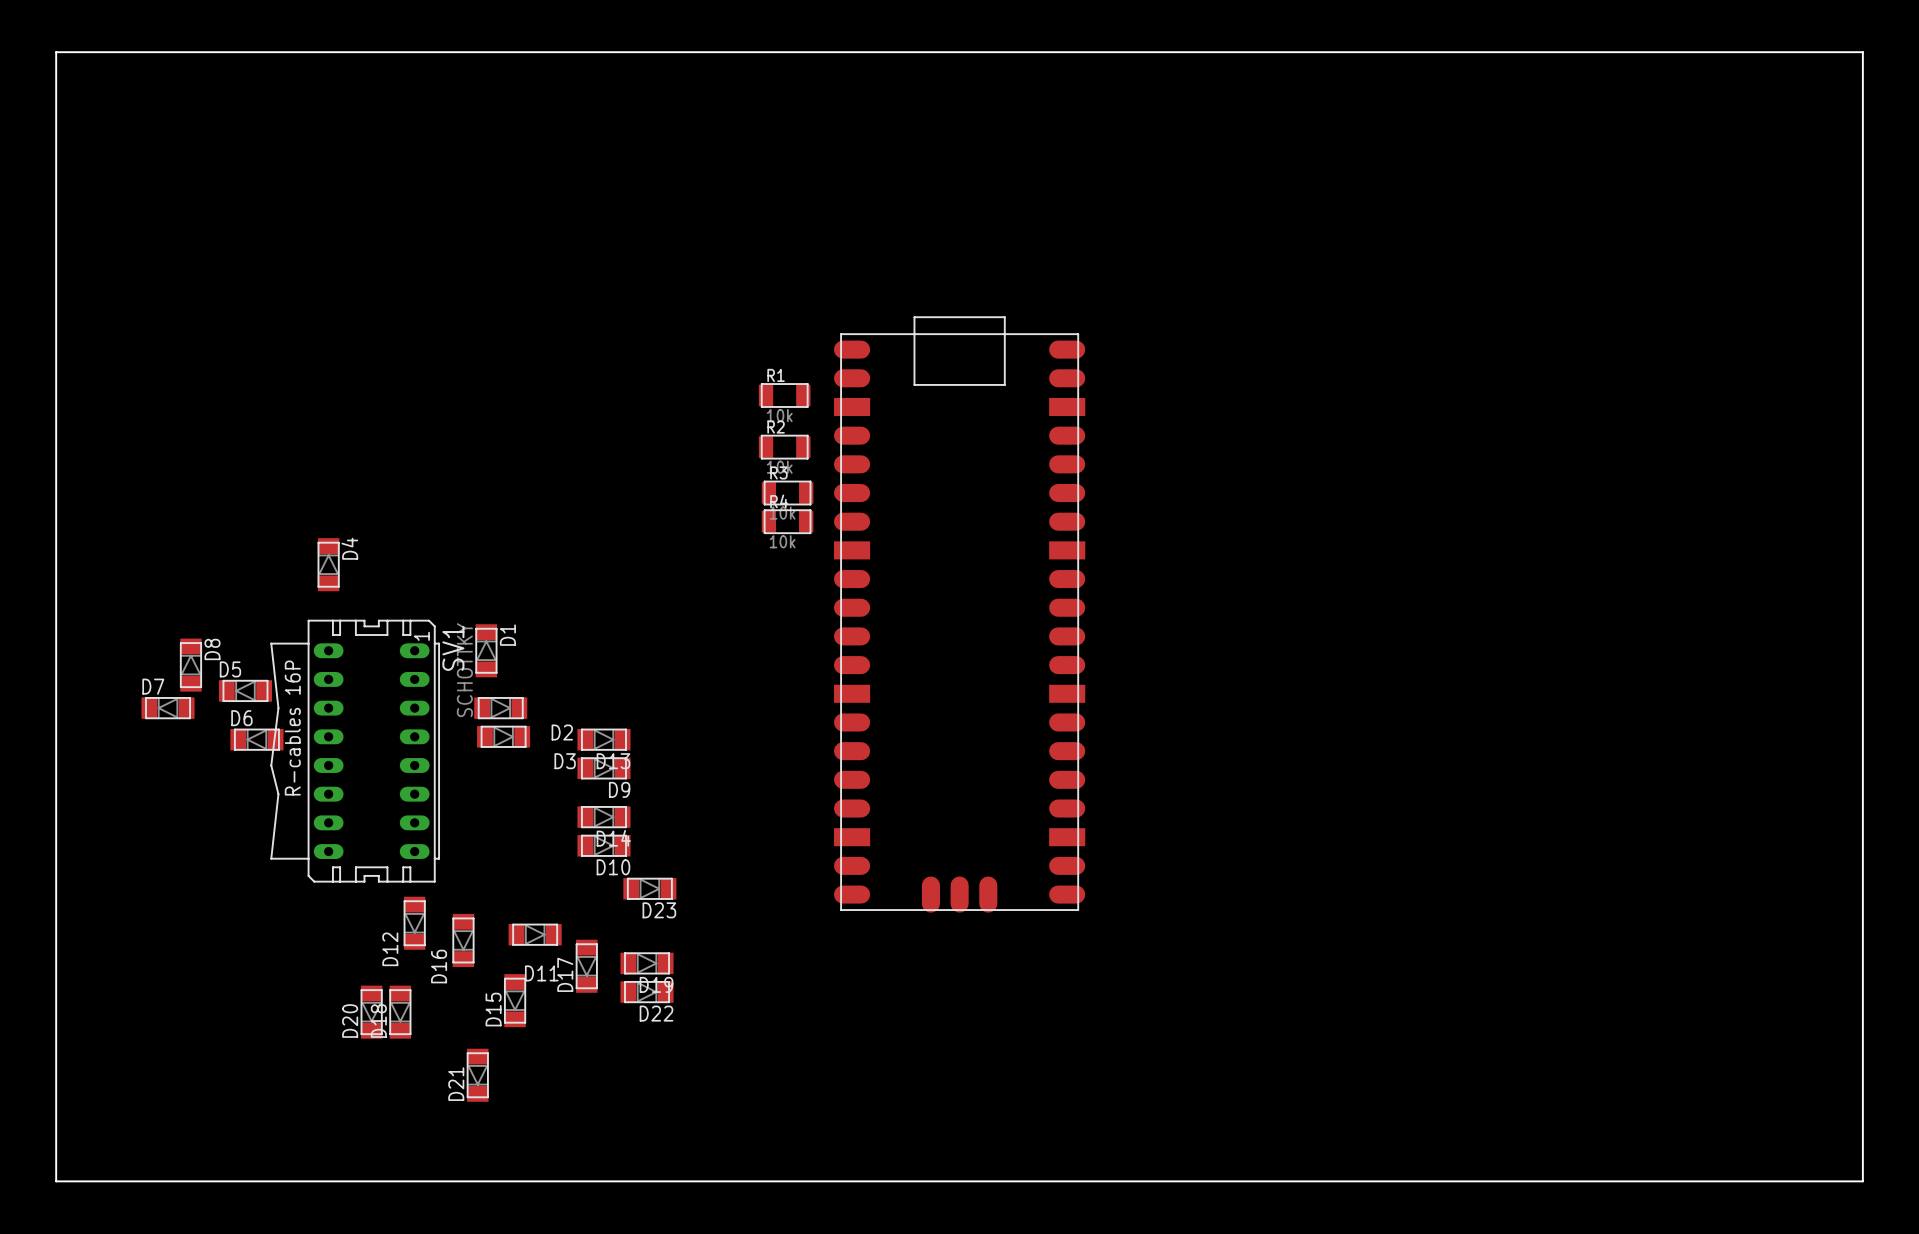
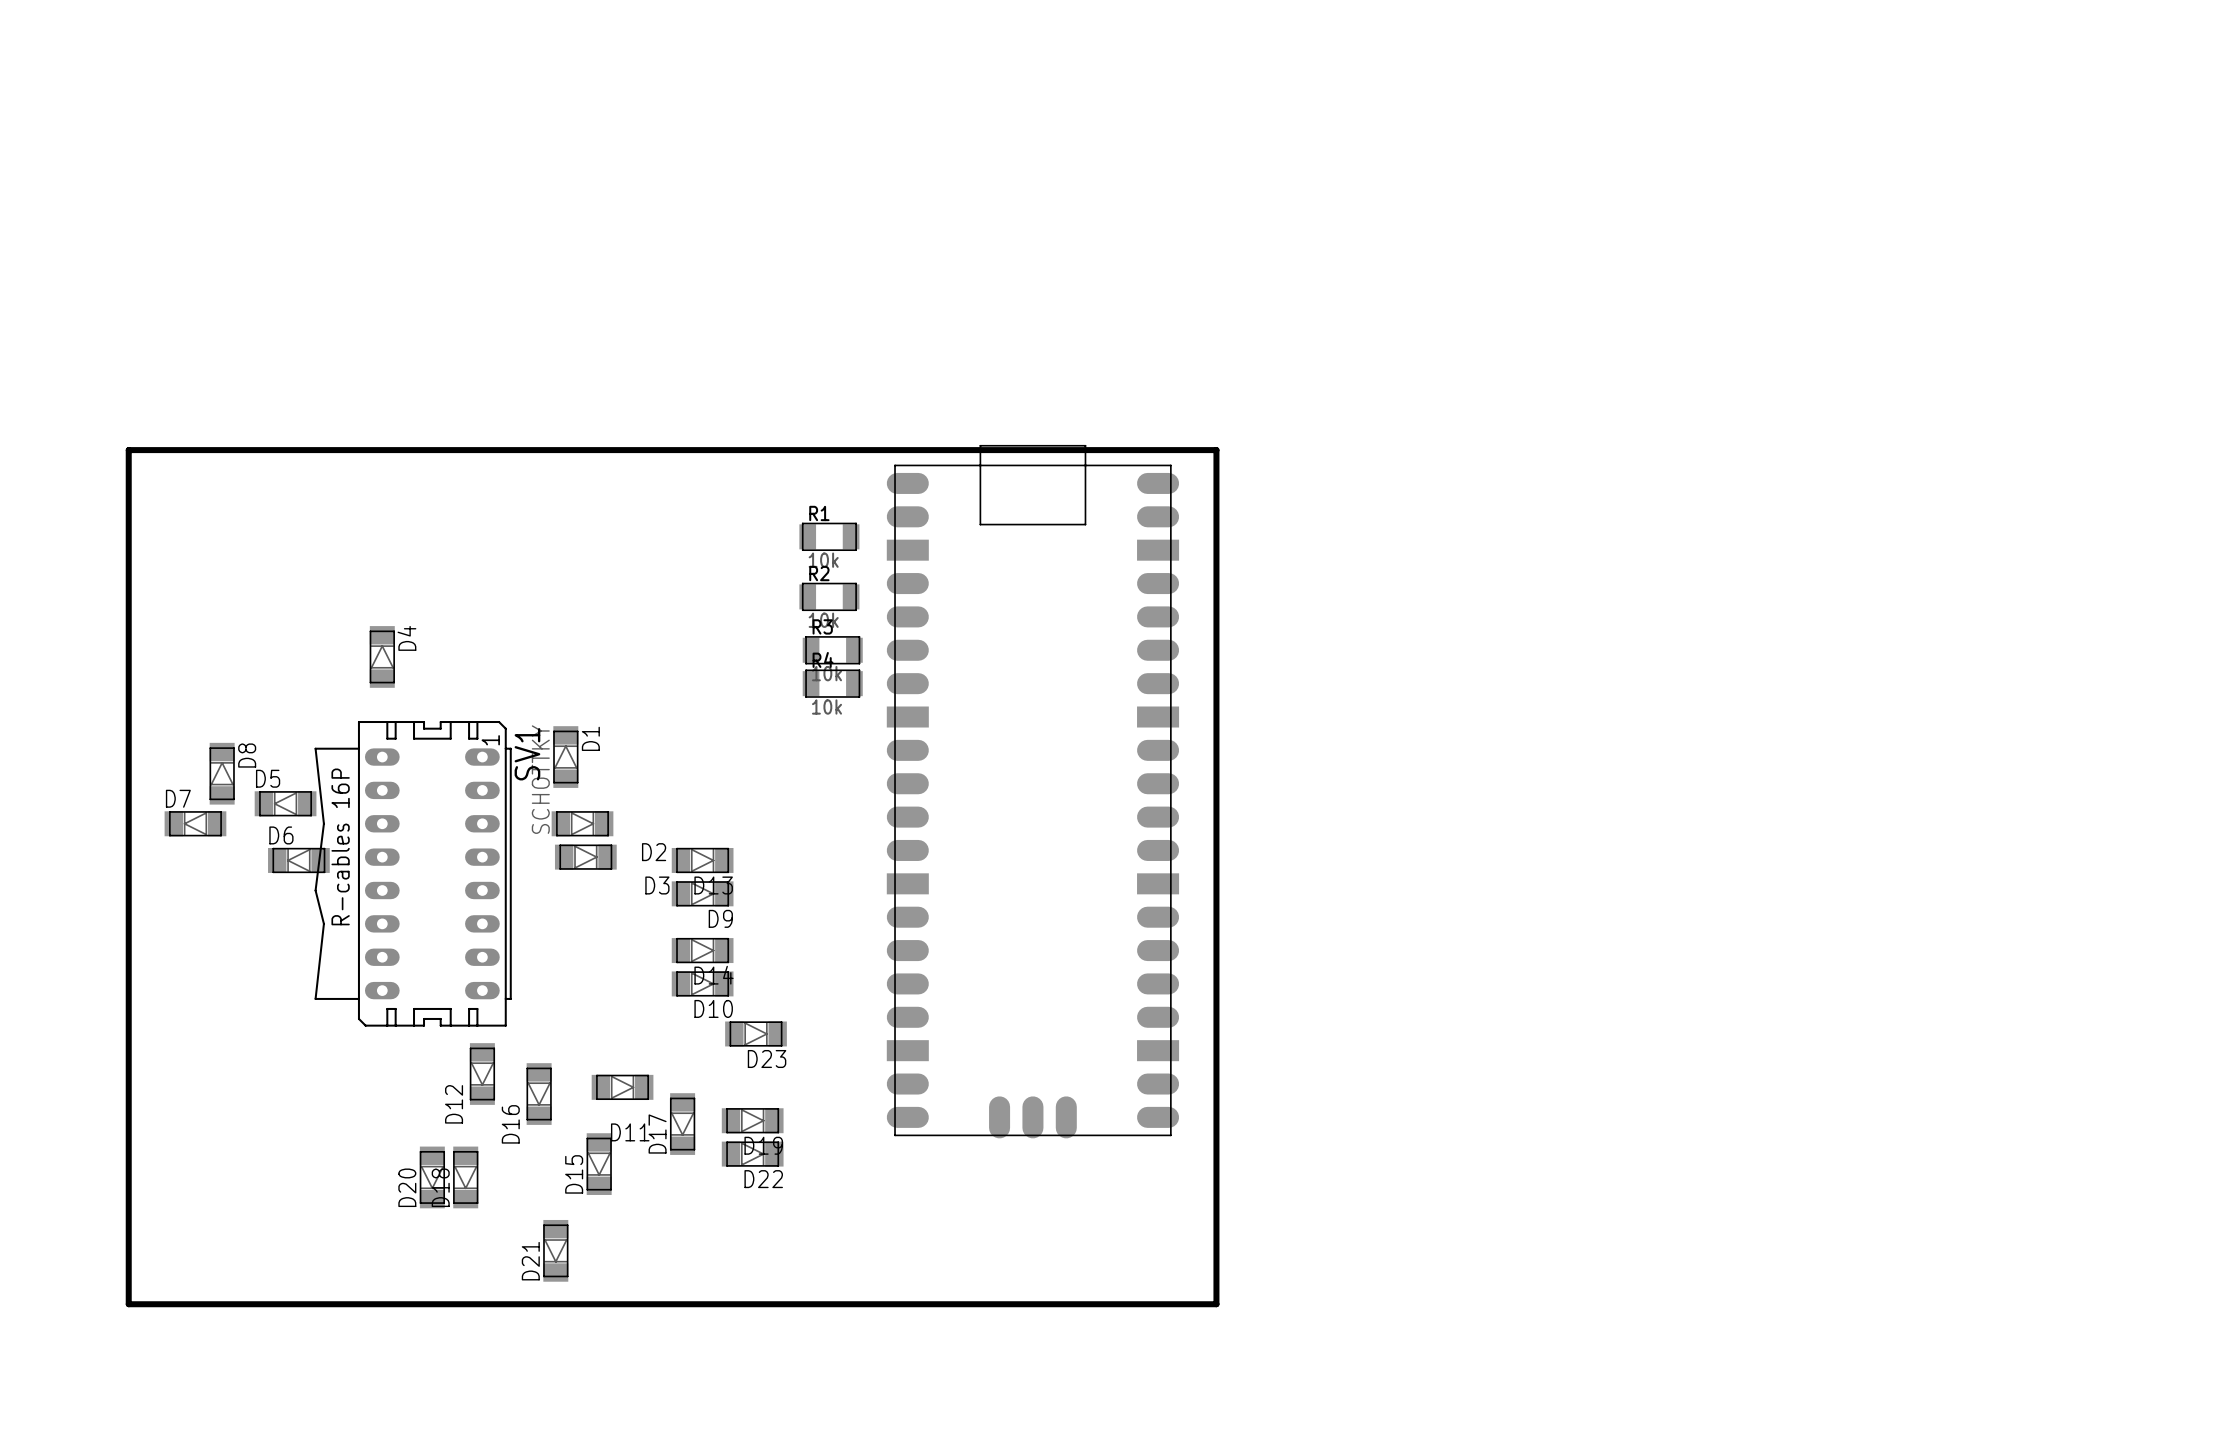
board edge: (56, 52) (1862, 52) (1862, 1181) (56, 1181) (56, 52) -> none
board edge: none -> (128, 450) (1216, 450) (1216, 1304) (128, 1304) (128, 450)
R1 position: (784, 395) -> (829, 536)
R2 position: (784, 447) -> (829, 596)
R3 position: (787, 493) -> (832, 650)
R4 position: (787, 521) -> (832, 683)
part position: (959, 614) -> (1032, 791)

